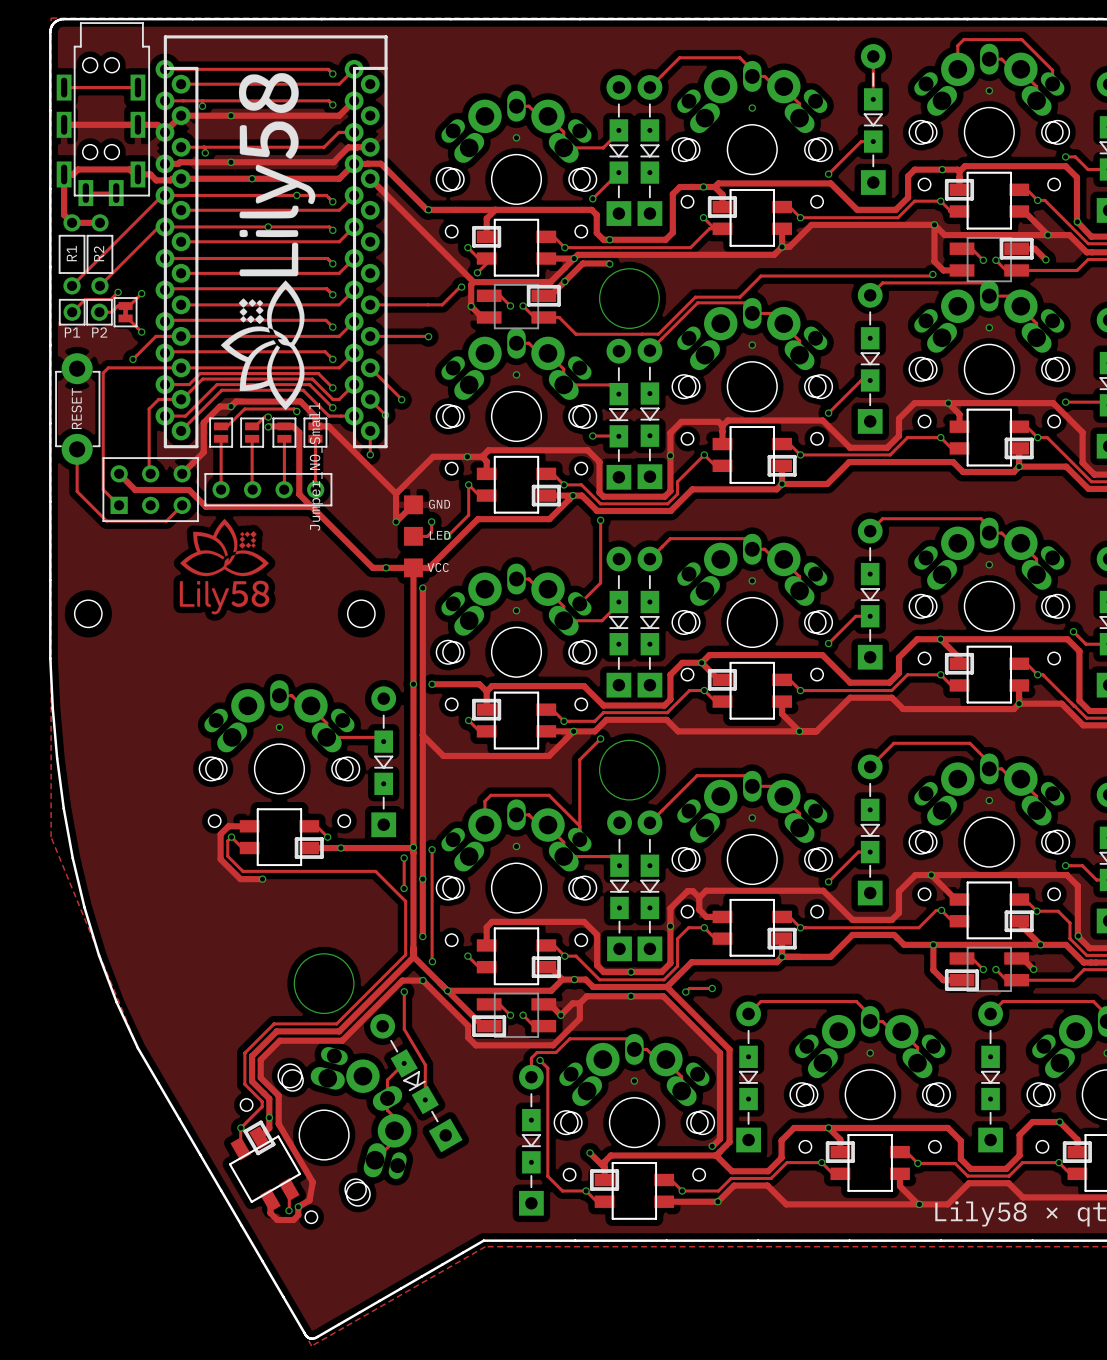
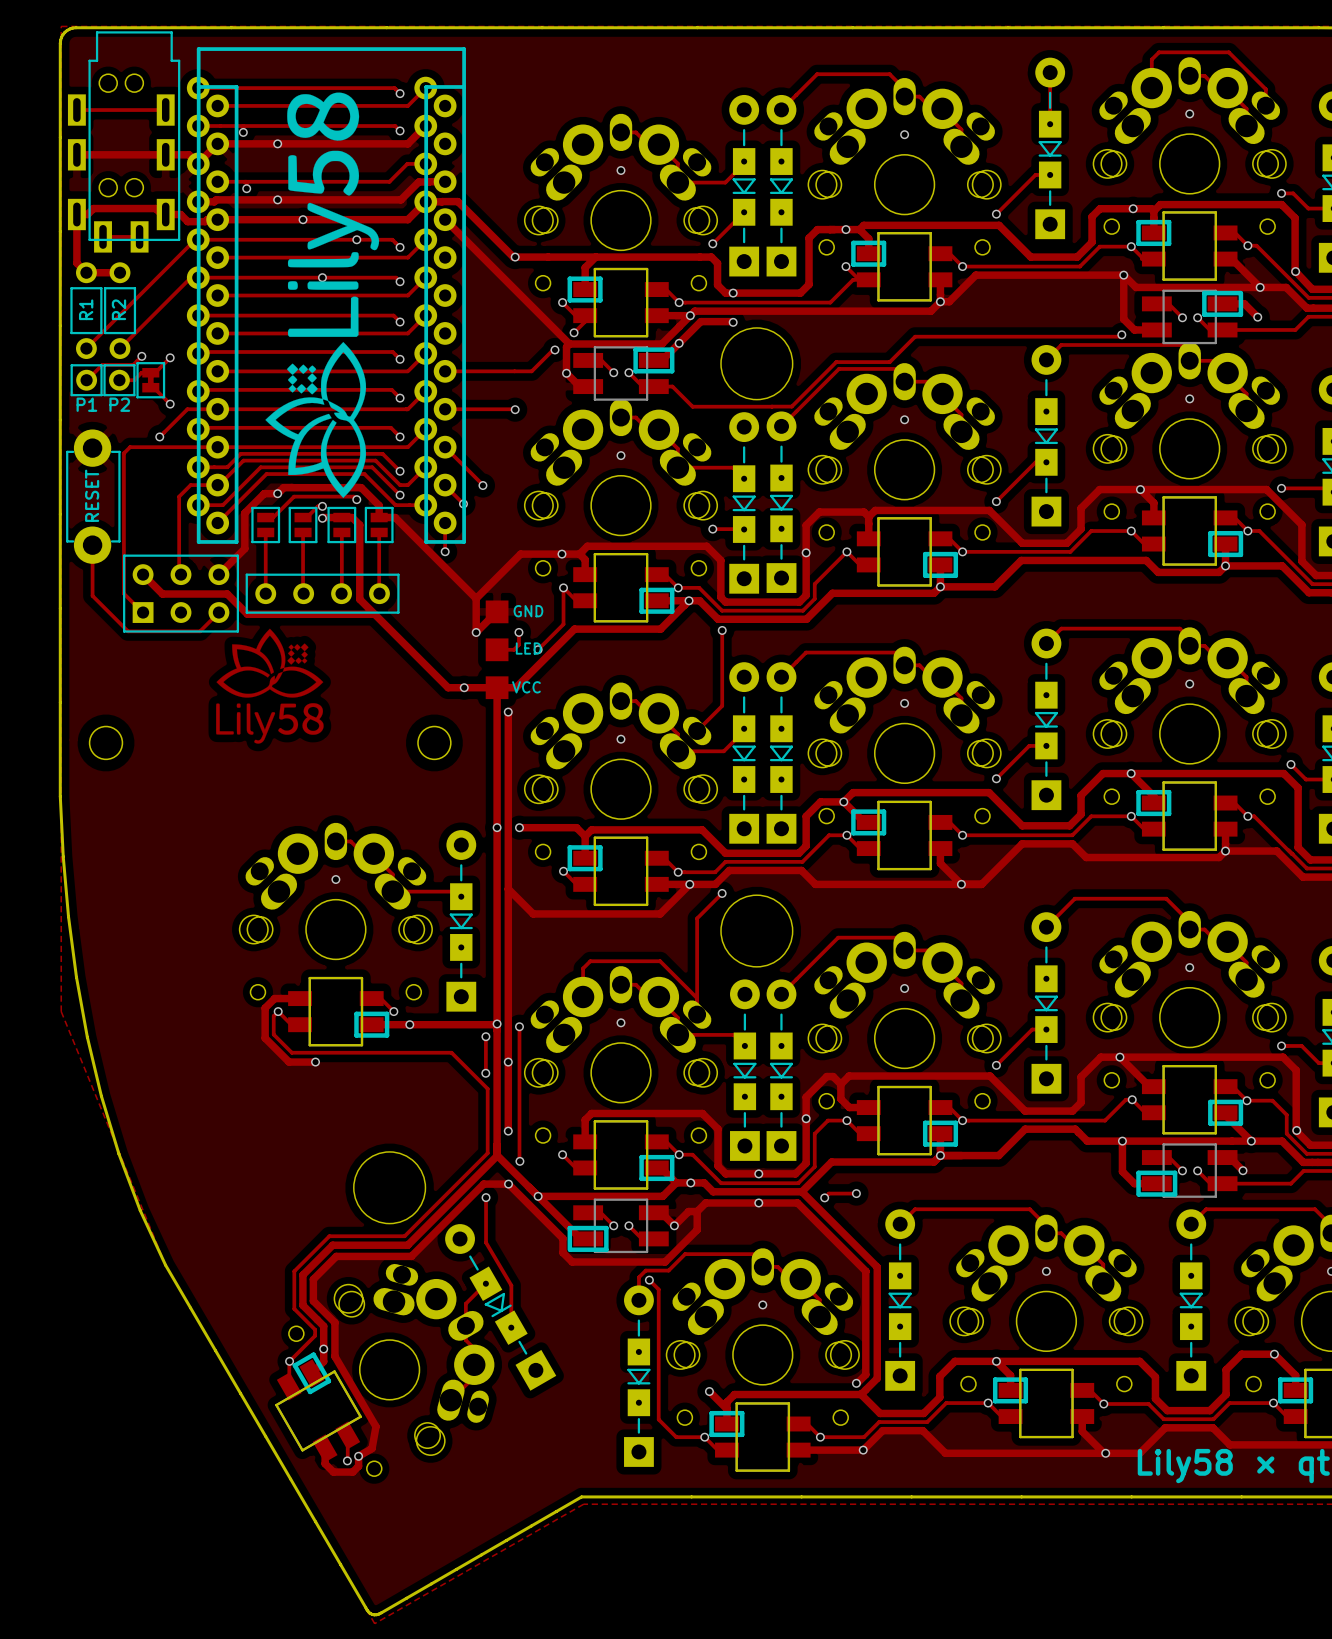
part value: Jumper_NO_Small (316, 466) -> none

